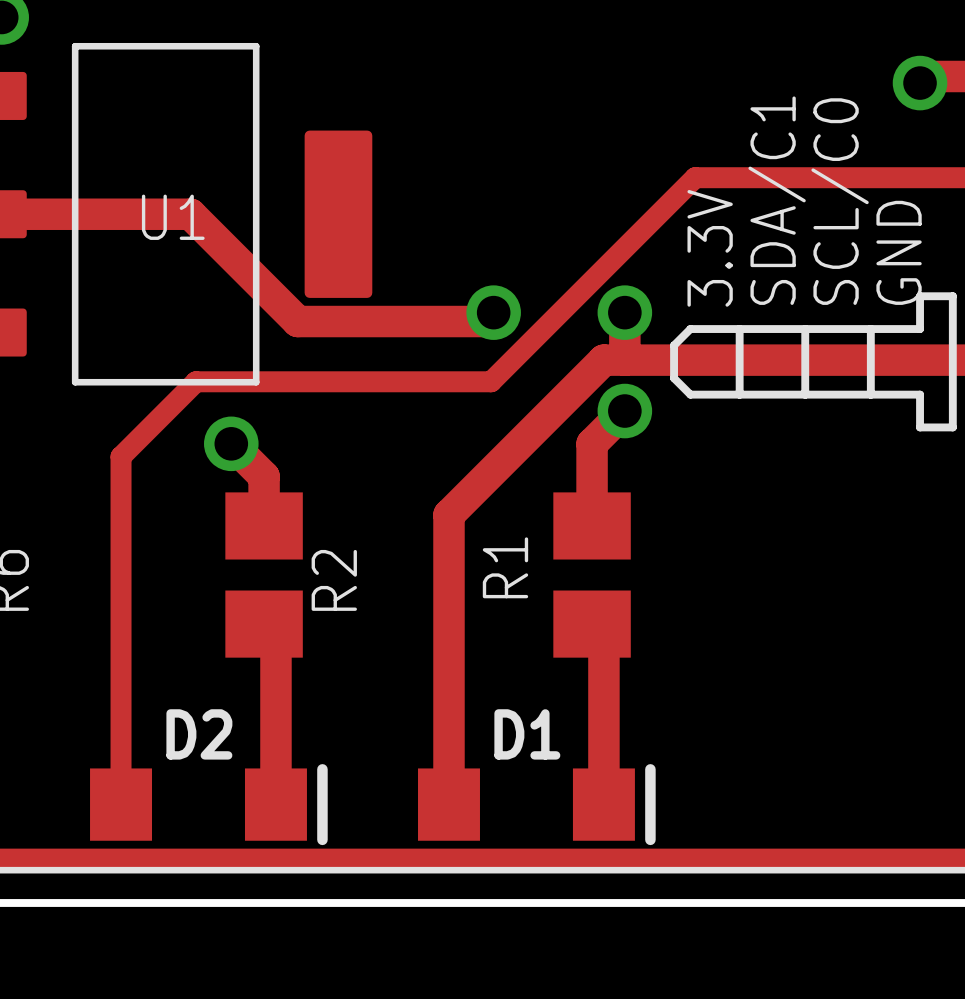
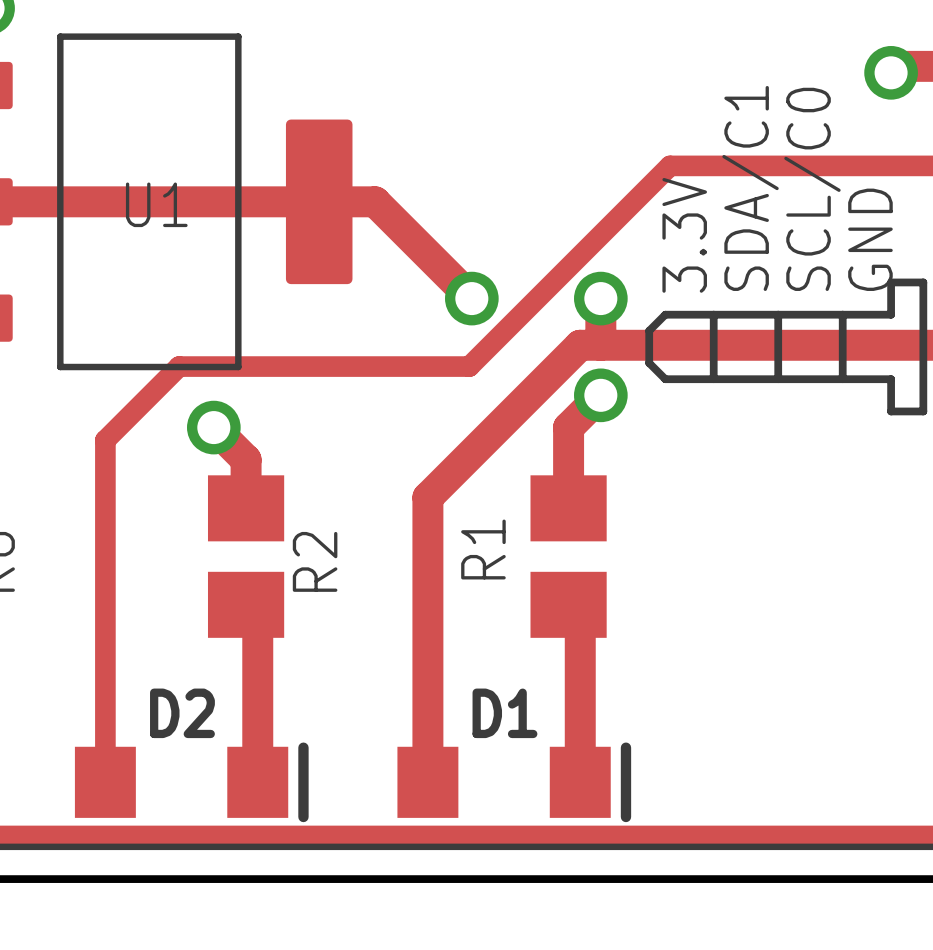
track: (190, 214) (297, 321) (484, 321) (493, 312) -> (173, 201) (375, 201) (471, 298)

